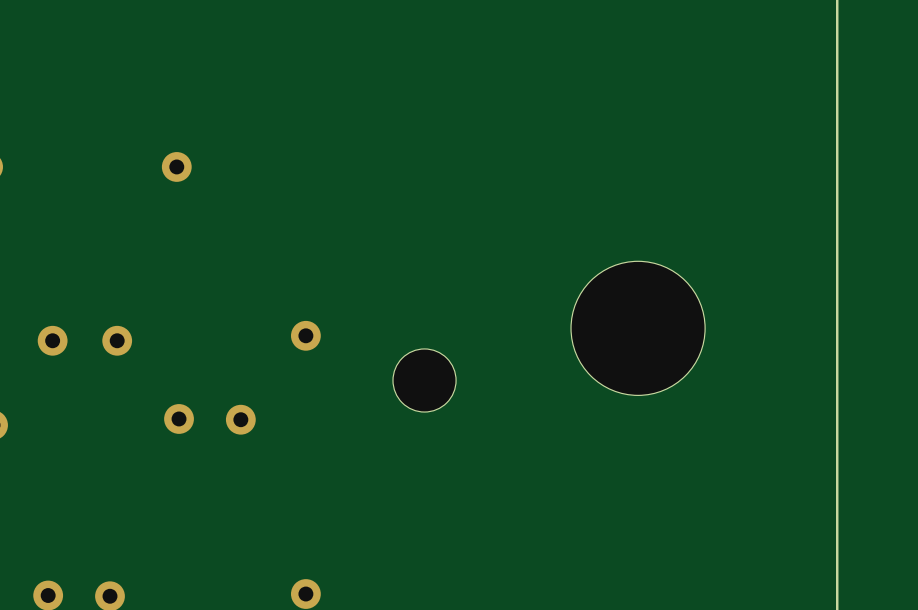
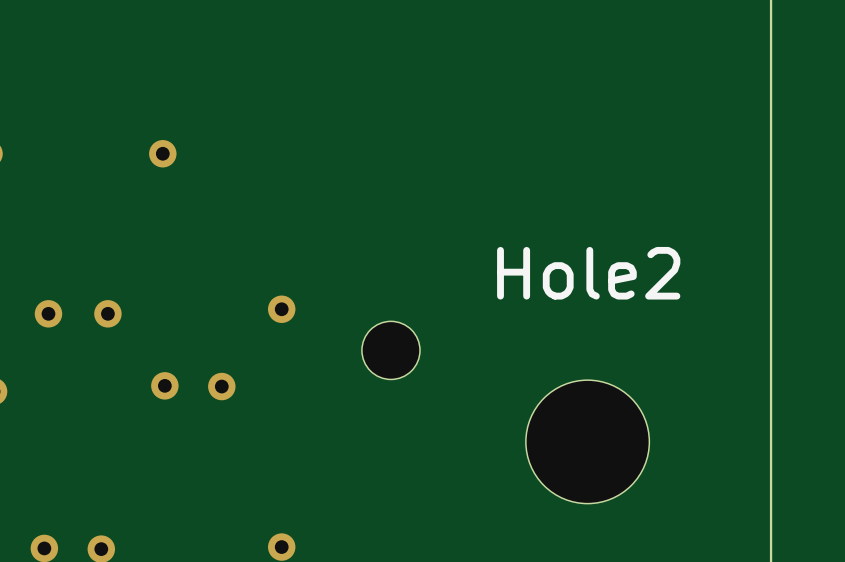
part: (638, 328) -> none
Hole2: none -> (587, 441)

